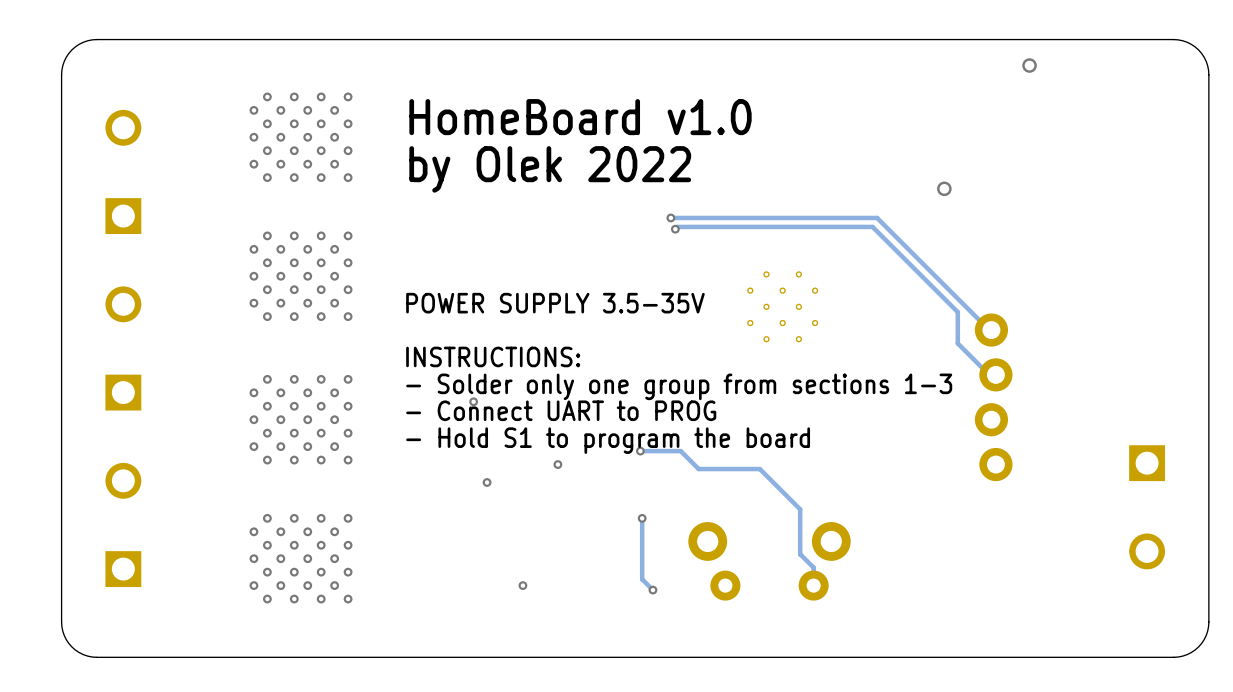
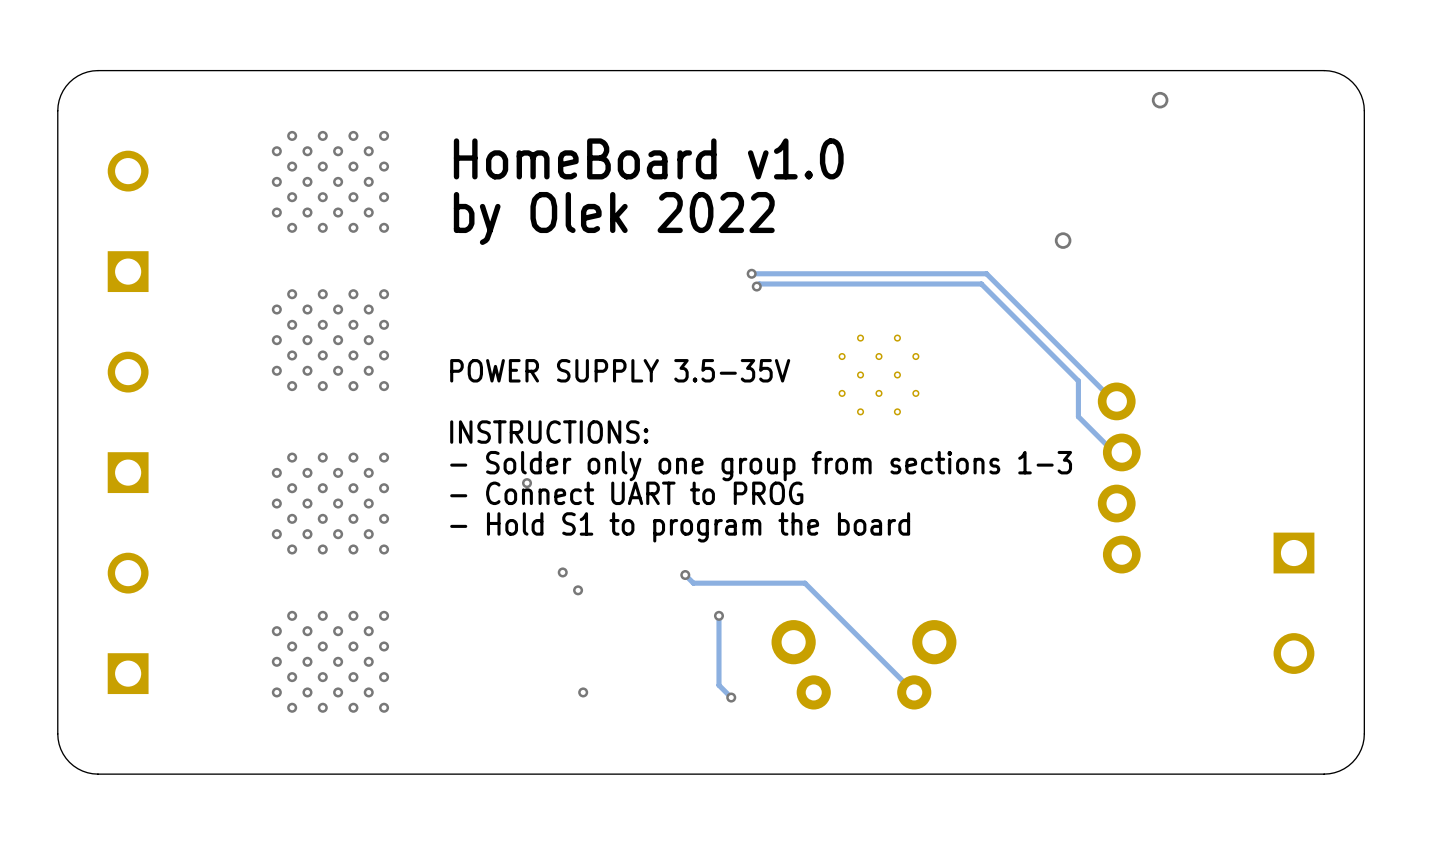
track: (640, 451) (680, 451) (698, 469) (759, 469) (800, 509) (800, 554) (813, 567) (813, 585) -> (685, 575) (693, 583) (804, 583) (914, 692)
via: (640, 451) -> none
via: (557, 464) -> none
via: none -> (562, 572)
via: (487, 482) -> none
via: none -> (685, 575)
via: none -> (578, 590)

